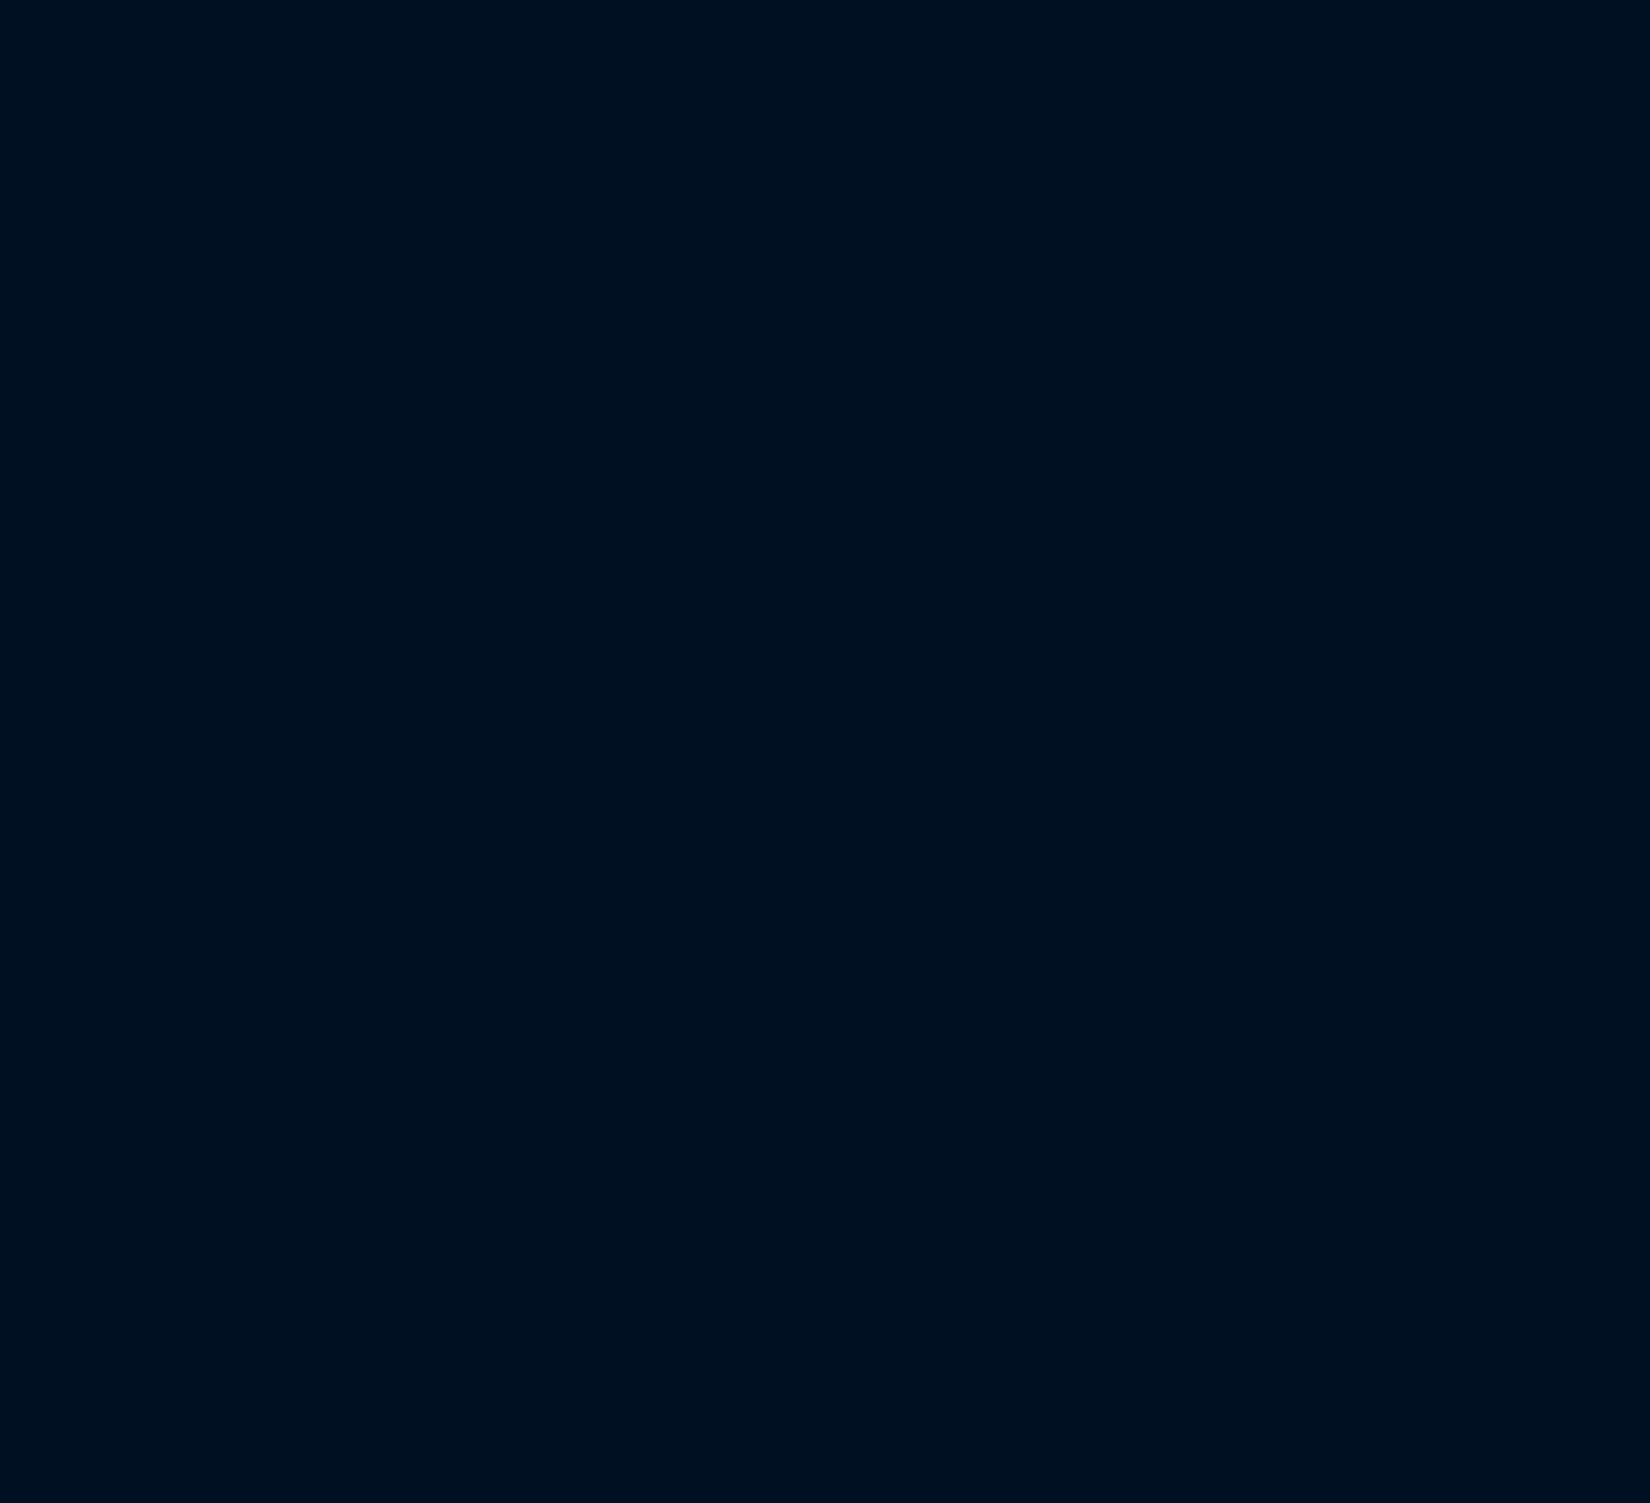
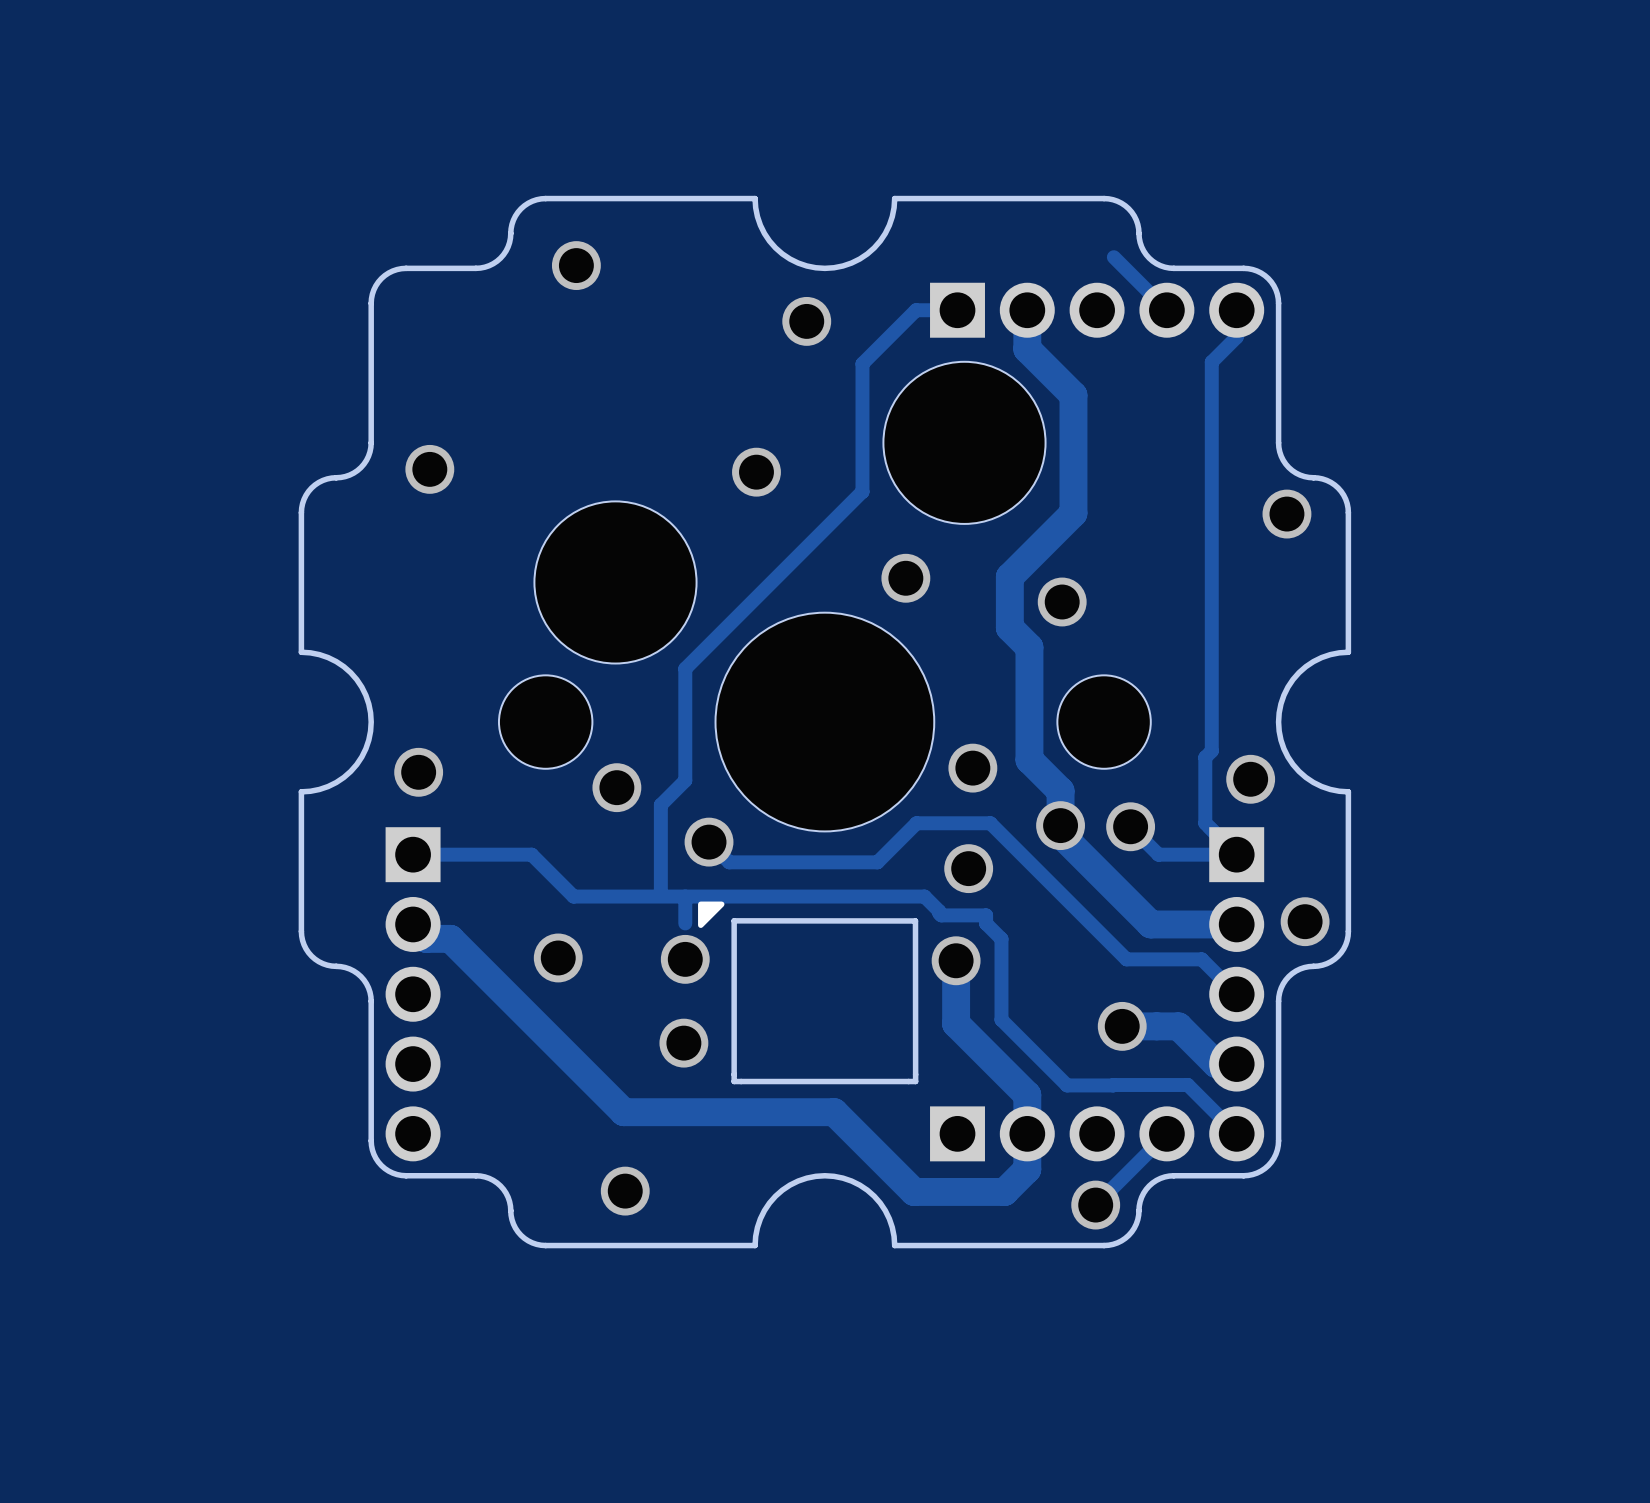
board edge: none -> (1104, 198) (894, 198) (889, 225) (874, 247) (851, 263) (824, 268) (798, 263) (775, 247) (760, 225) (755, 198) (541, 198) (528, 203) (518, 212) (513, 220) (510, 233)
board edge: none -> (1104, 198) (1117, 201) (1128, 208) (1136, 220) (1140, 242) (1146, 254) (1156, 263) (1173, 268)
board edge: none -> (510, 233) (506, 250) (497, 261) (489, 265) (475, 268) (401, 268) (388, 273) (378, 282) (372, 294) (371, 303) (370, 451) (363, 464) (353, 473) (322, 480) (311, 487) (304, 499) (301, 512)
track: none -> (1113, 257) (1166, 310)
via: none -> (576, 265)
board edge: none -> (1173, 268) (1248, 268) (1261, 273) (1271, 282) (1277, 294) (1278, 303) (1278, 442) (1281, 456) (1285, 464) (1296, 473) (1304, 476) (1322, 478) (1334, 484) (1341, 491) (1347, 503) (1348, 652) (1321, 657) (1299, 672) (1283, 695) (1278, 722) (1283, 748) (1299, 771) (1321, 786) (1348, 791) (1348, 931)
track: none -> (957, 310) (916, 310) (862, 363) (862, 491) (685, 668) (685, 780) (660, 804) (660, 892)
track: none -> (1027, 310) (1027, 349) (1073, 395) (1073, 513) (1009, 576) (1009, 627) (1029, 647) (1029, 759) (1060, 791) (1060, 834) (1150, 924) (1236, 924)
part: none -> (1097, 310)
track: none -> (1236, 310) (1236, 337) (1211, 362) (1211, 751) (1205, 757) (1205, 823) (1236, 854) (1158, 854) (1130, 826)
via: none -> (806, 321)
via: none -> (429, 469)
via: none -> (756, 472)
board edge: none -> (301, 512) (301, 652) (328, 657) (350, 672) (365, 695) (371, 722) (365, 748) (350, 771) (328, 786) (301, 791) (302, 940) (306, 948) (315, 959) (327, 965) (345, 967) (353, 971) (360, 976) (368, 987) (371, 1001) (371, 1140) (372, 1149) (378, 1162) (388, 1171) (401, 1175) (475, 1175) (493, 1180) (503, 1189) (508, 1197) (511, 1219) (518, 1231) (532, 1242) (545, 1245)
via: none -> (1286, 514)
via: none -> (905, 578)
part: none -> (824, 596)
via: none -> (1062, 602)
via: none -> (972, 768)
via: none -> (418, 772)
via: none -> (1250, 779)
via: none -> (616, 787)
via: none -> (1060, 825)
via: none -> (1130, 826)
track: none -> (709, 842) (729, 862) (877, 862) (916, 823) (990, 823) (1126, 959) (1201, 959) (1236, 994)
via: none -> (709, 842)
track: none -> (413, 854) (531, 854) (573, 896) (924, 896) (941, 915) (986, 915) (986, 923) (1001, 938) (1001, 1019) (1067, 1085) (1113, 1085)
via: none -> (968, 868)
track: none -> (685, 896) (685, 923)
drawing: none -> [698, 901, 725, 928]
board edge: none -> (734, 920) (734, 1081) (915, 1081) (915, 920) (734, 920)
via: none -> (1305, 921)
track: none -> (413, 924) (426, 938) (450, 938) (623, 1112) (834, 1112) (914, 1191) (1004, 1191) (1027, 1169) (1027, 1095) (956, 1023) (956, 960)
board edge: none -> (1348, 931) (1345, 944) (1338, 956) (1326, 963) (1296, 971) (1285, 980) (1279, 992) (1278, 1140) (1277, 1149) (1271, 1162) (1261, 1171) (1248, 1175) (1173, 1175) (1156, 1180) (1146, 1189) (1141, 1197) (1134, 1228) (1125, 1238) (1117, 1242) (1104, 1245) (894, 1245) (889, 1218) (874, 1196) (851, 1181) (824, 1175) (798, 1181) (775, 1196) (760, 1218) (755, 1245) (545, 1245)
via: none -> (558, 957)
via: none -> (685, 959)
via: none -> (956, 960)
part: none -> (413, 994)
part: none -> (1236, 994)
track: none -> (1122, 1026) (1178, 1026) (1216, 1064) (1236, 1064)
via: none -> (1122, 1026)
via: none -> (683, 1043)
track: none -> (1113, 1085) (1187, 1085) (1236, 1133)
part: none -> (1062, 1133)
track: none -> (1166, 1133) (1095, 1205)
via: none -> (625, 1191)
via: none -> (1095, 1205)

